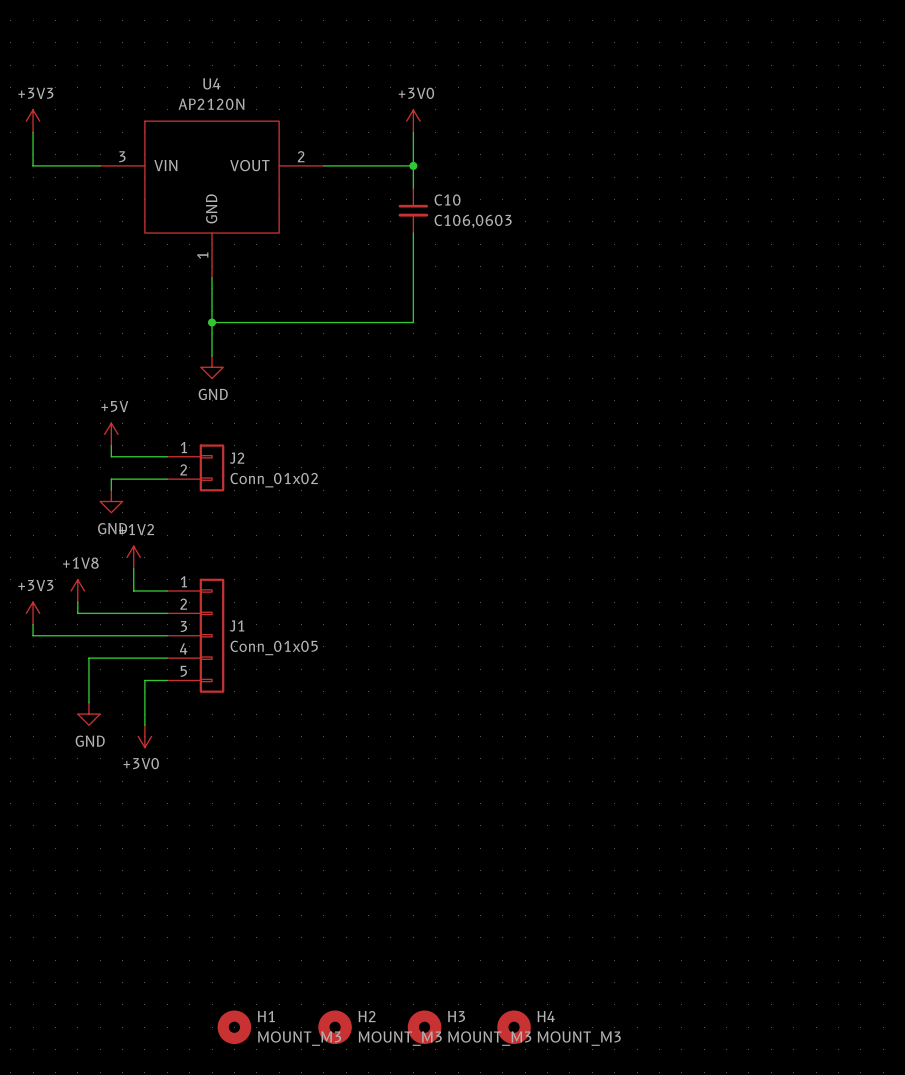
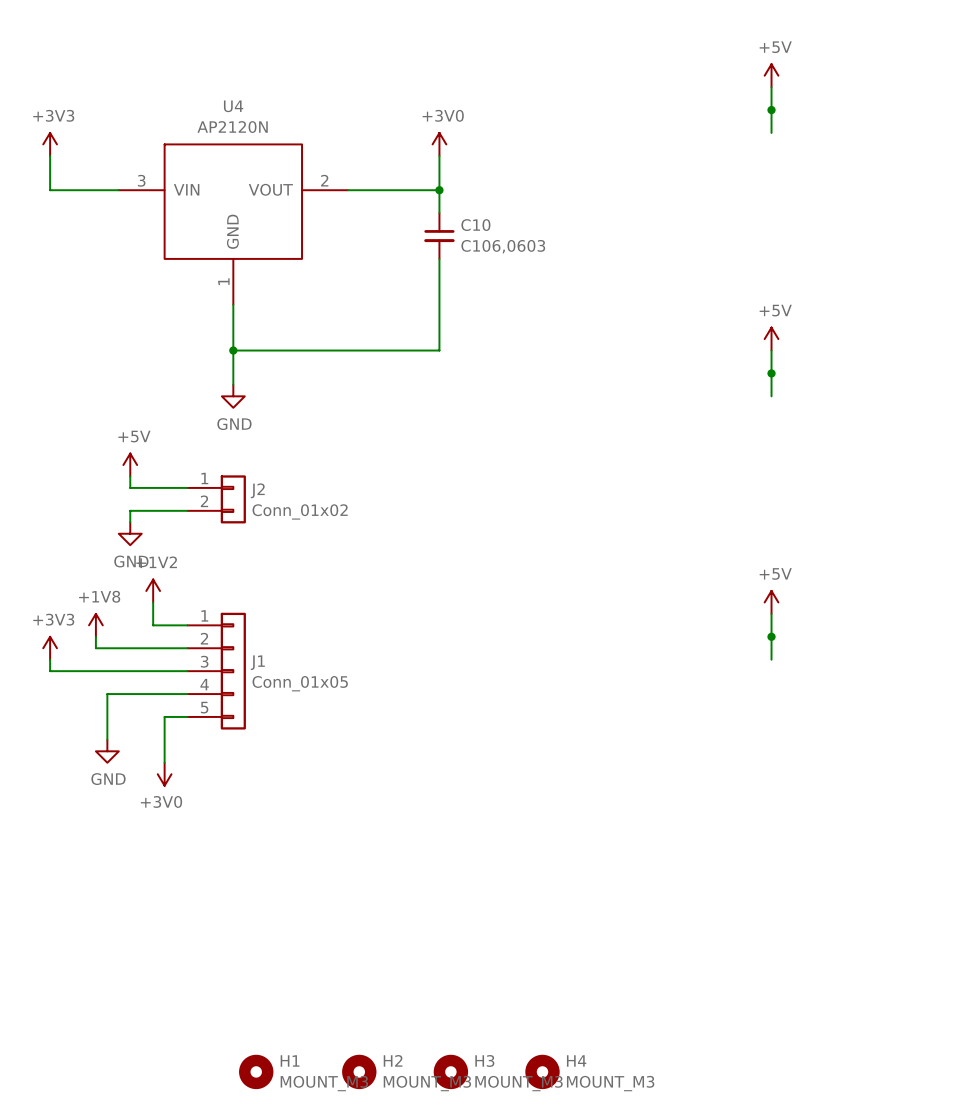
power symbol: none -> +5V (771, 75)
wire: none -> (771, 87) (771, 132)
junction: none -> (771, 110)
power symbol: none -> +5V (771, 339)
wire: none -> (771, 350) (771, 396)
junction: none -> (771, 373)
power symbol: none -> +5V (771, 602)
wire: none -> (771, 613) (771, 659)
junction: none -> (771, 636)

